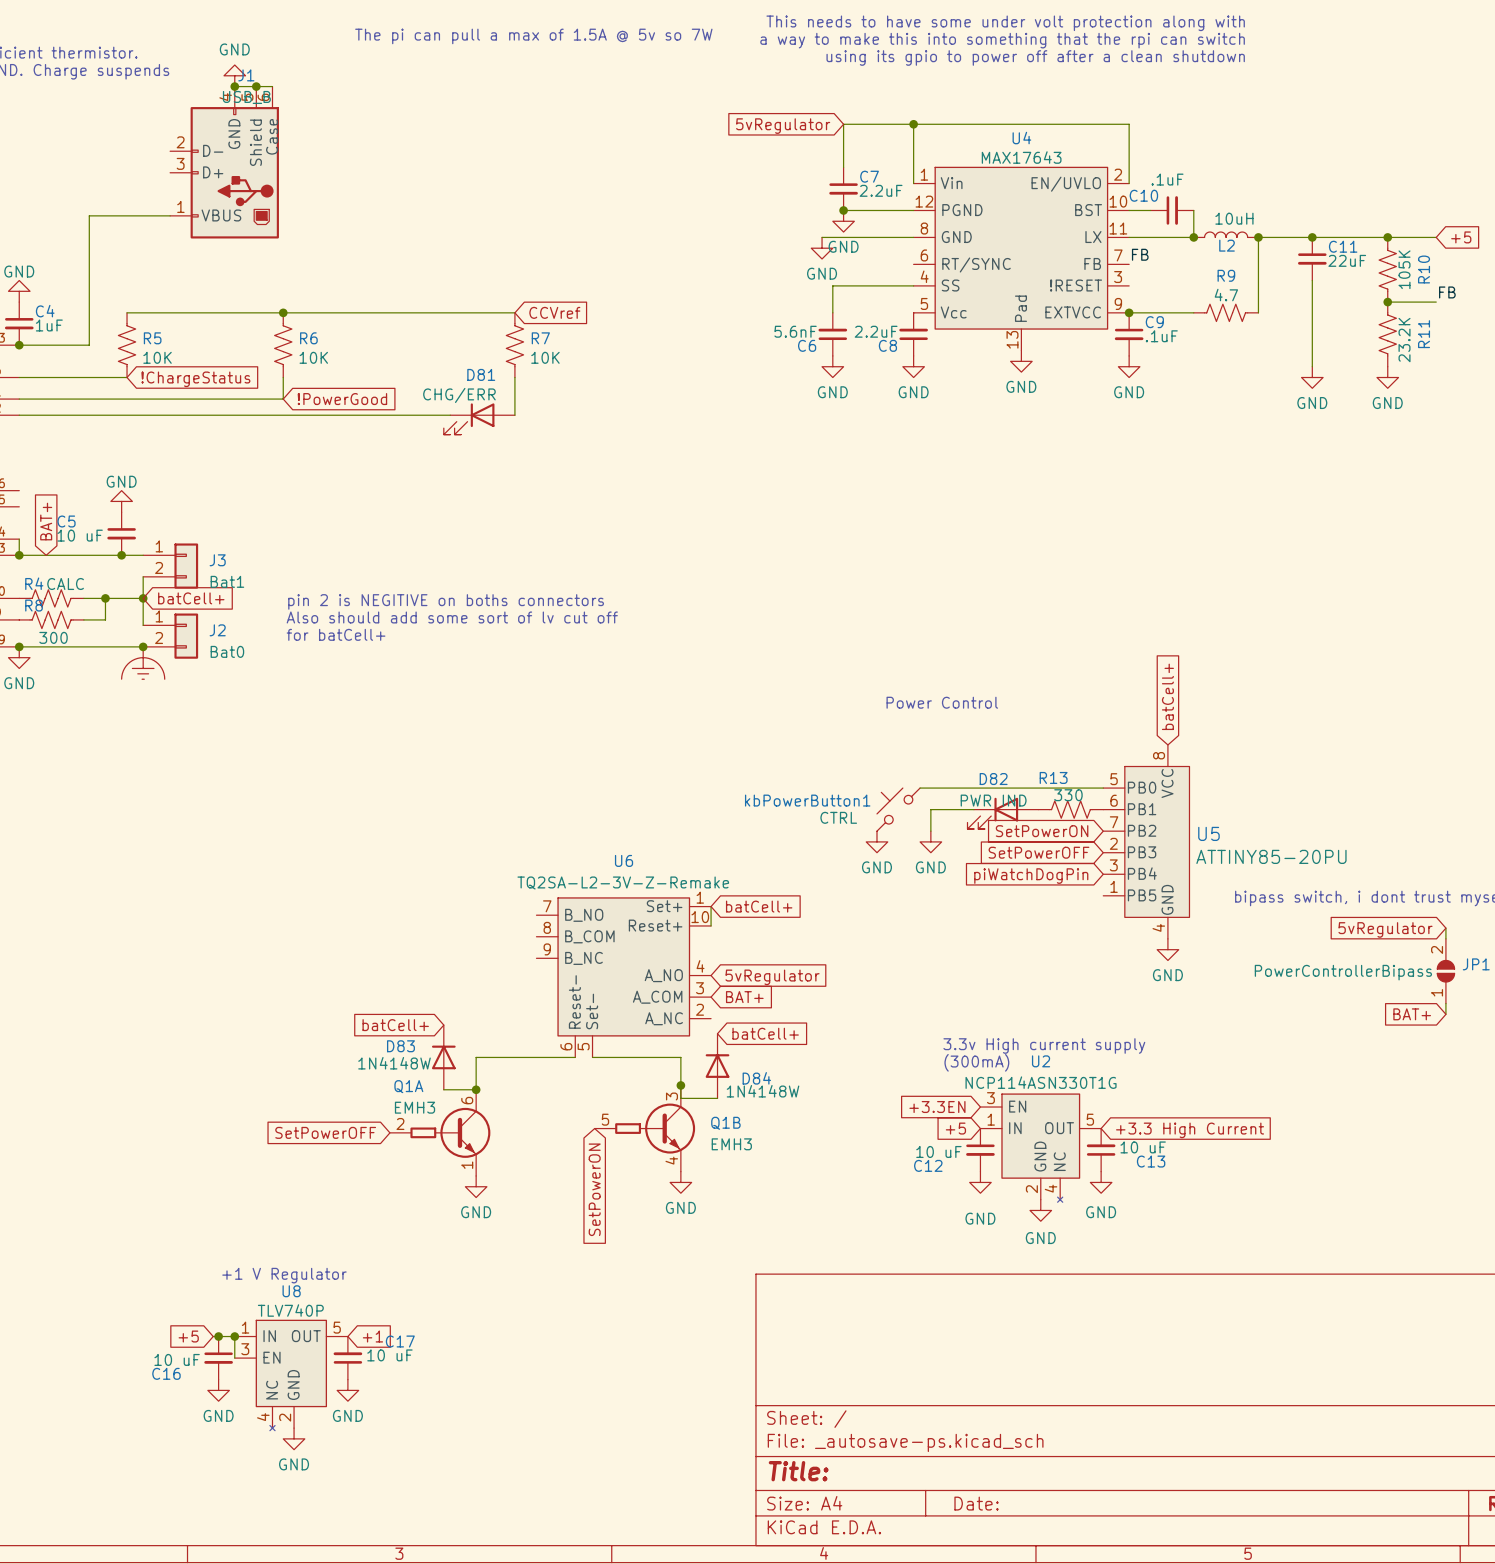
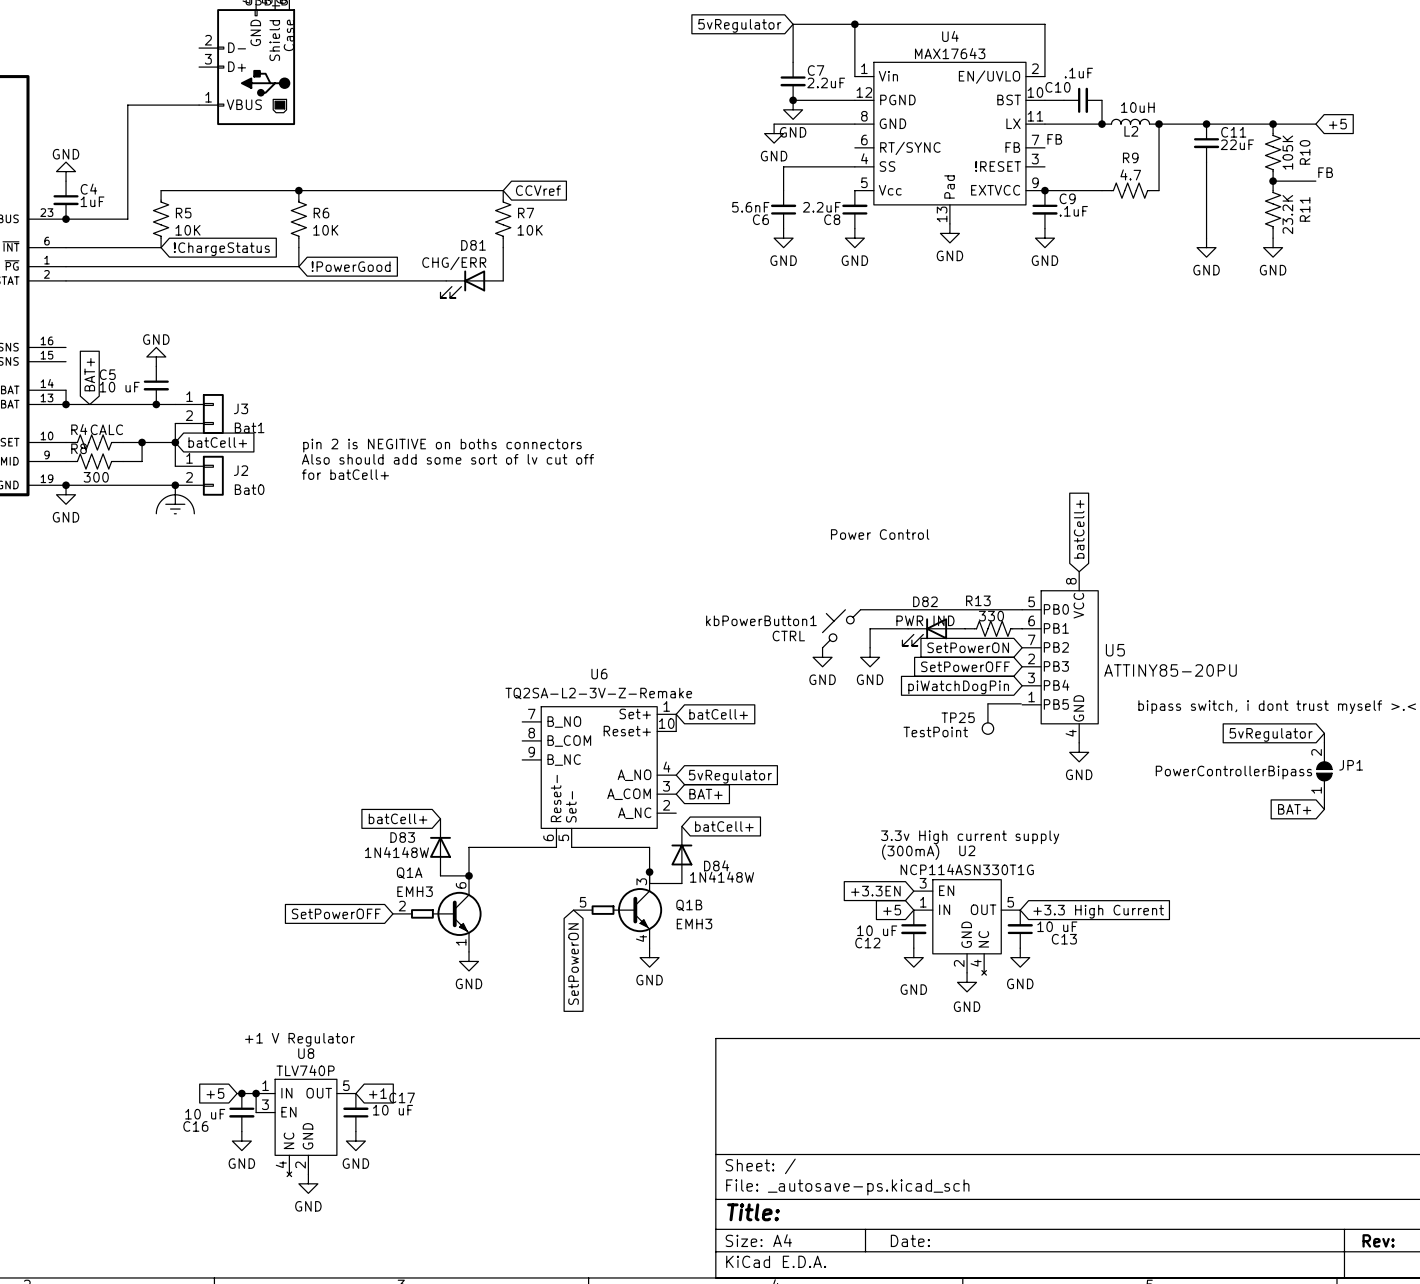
wire: none -> (987, 703) (1021, 703)
TP25: none -> TestPoint (987, 719)

